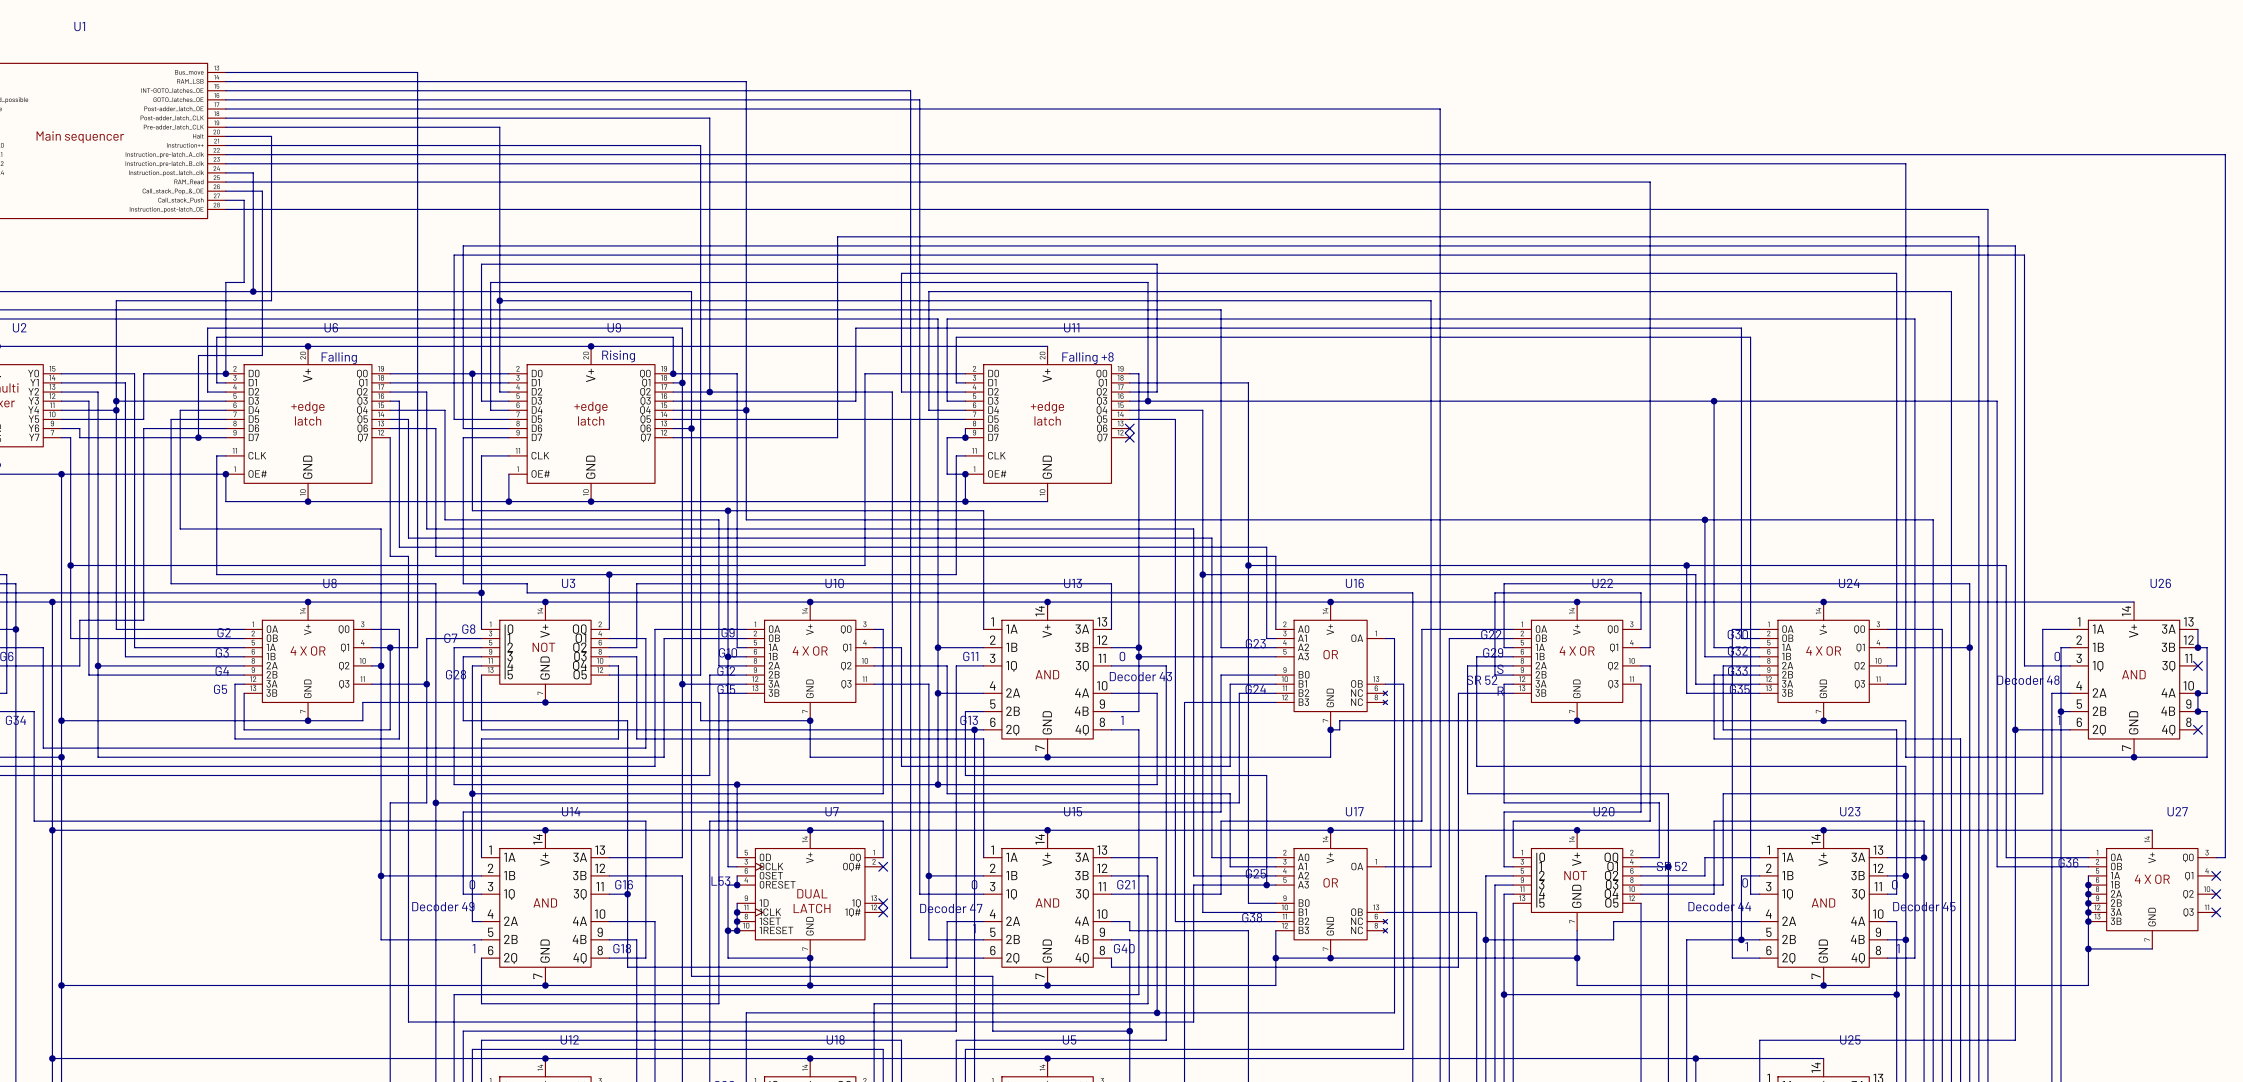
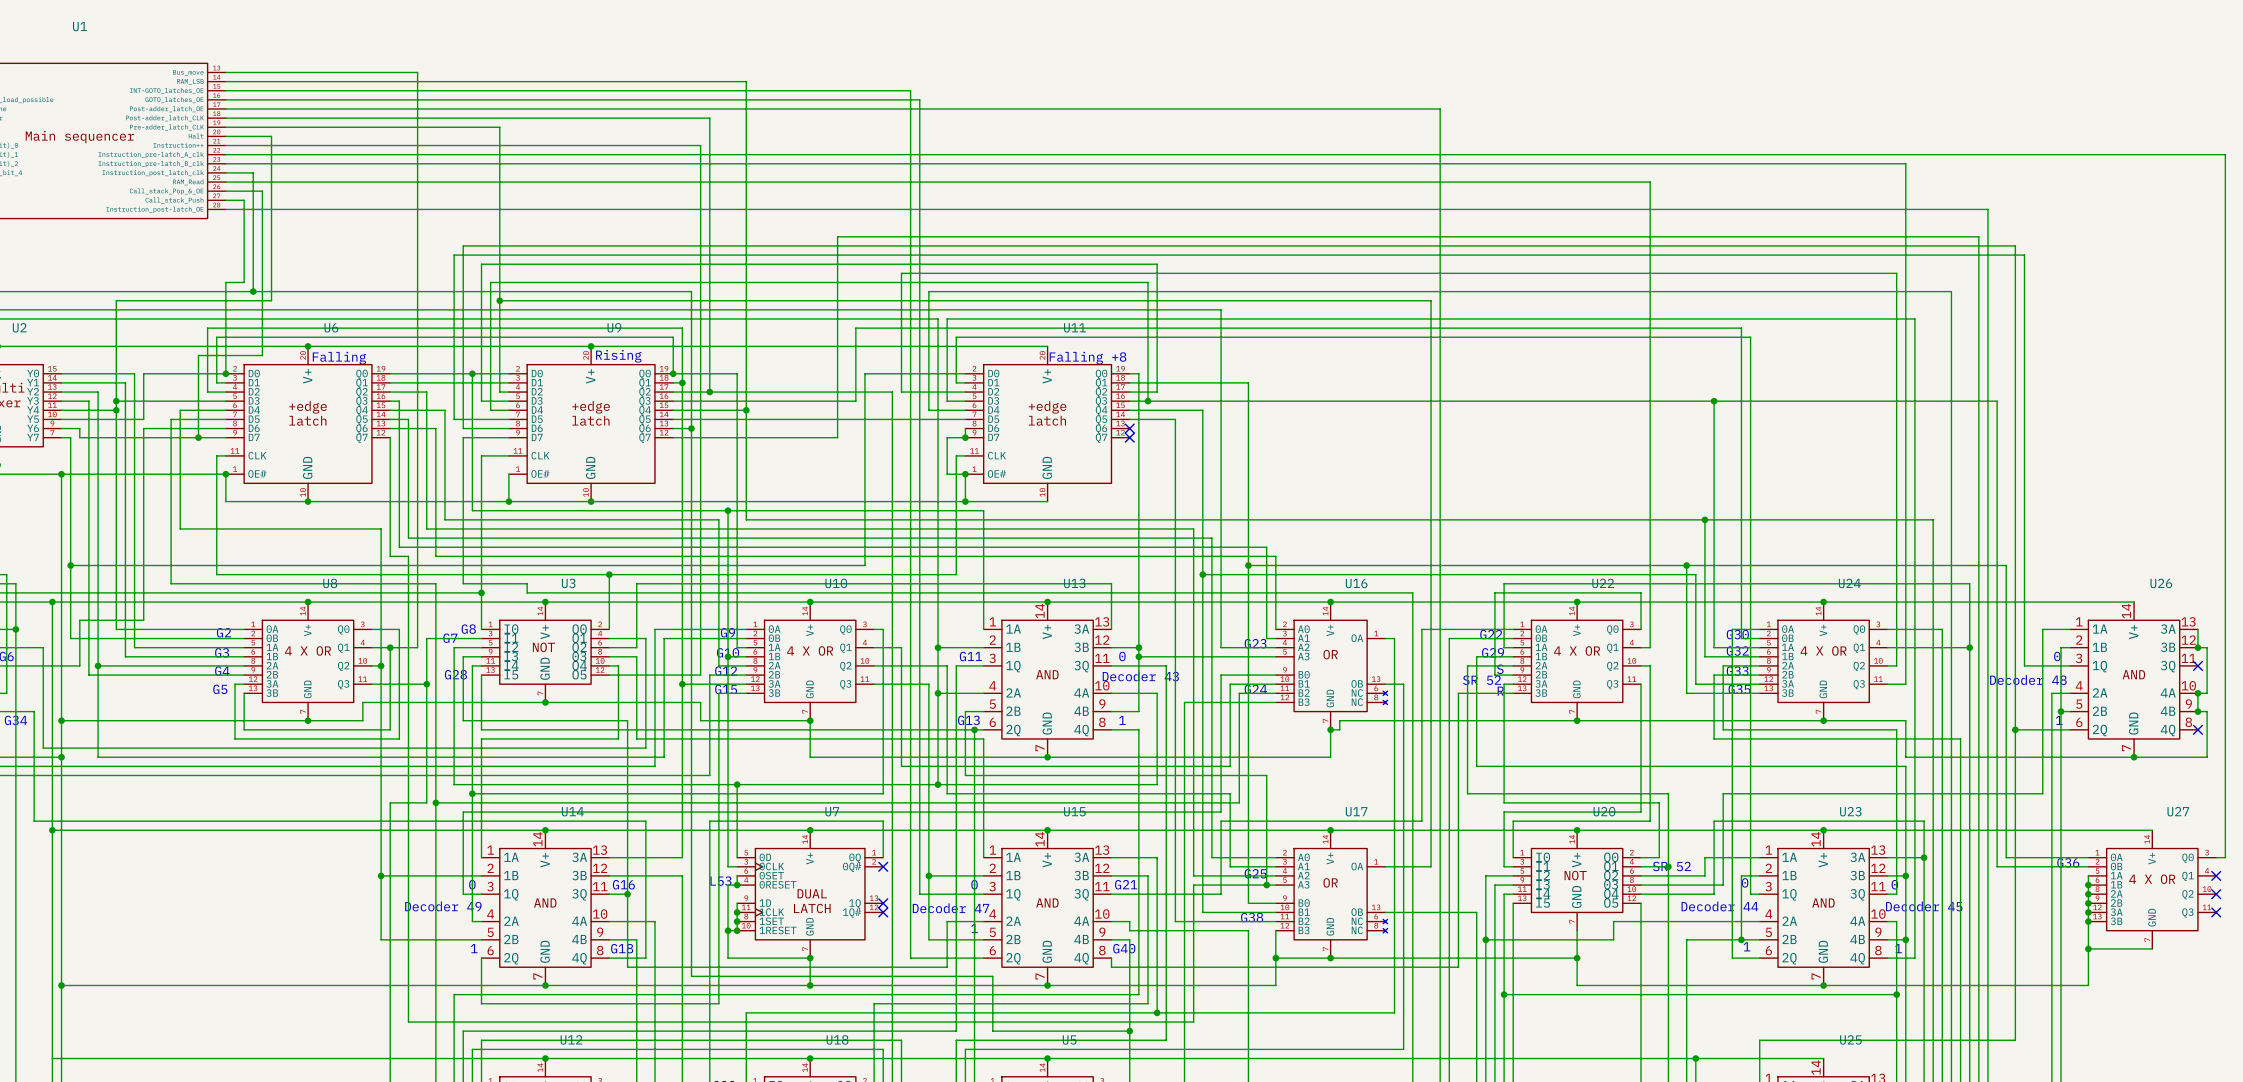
junction: (52, 1058) -> none

